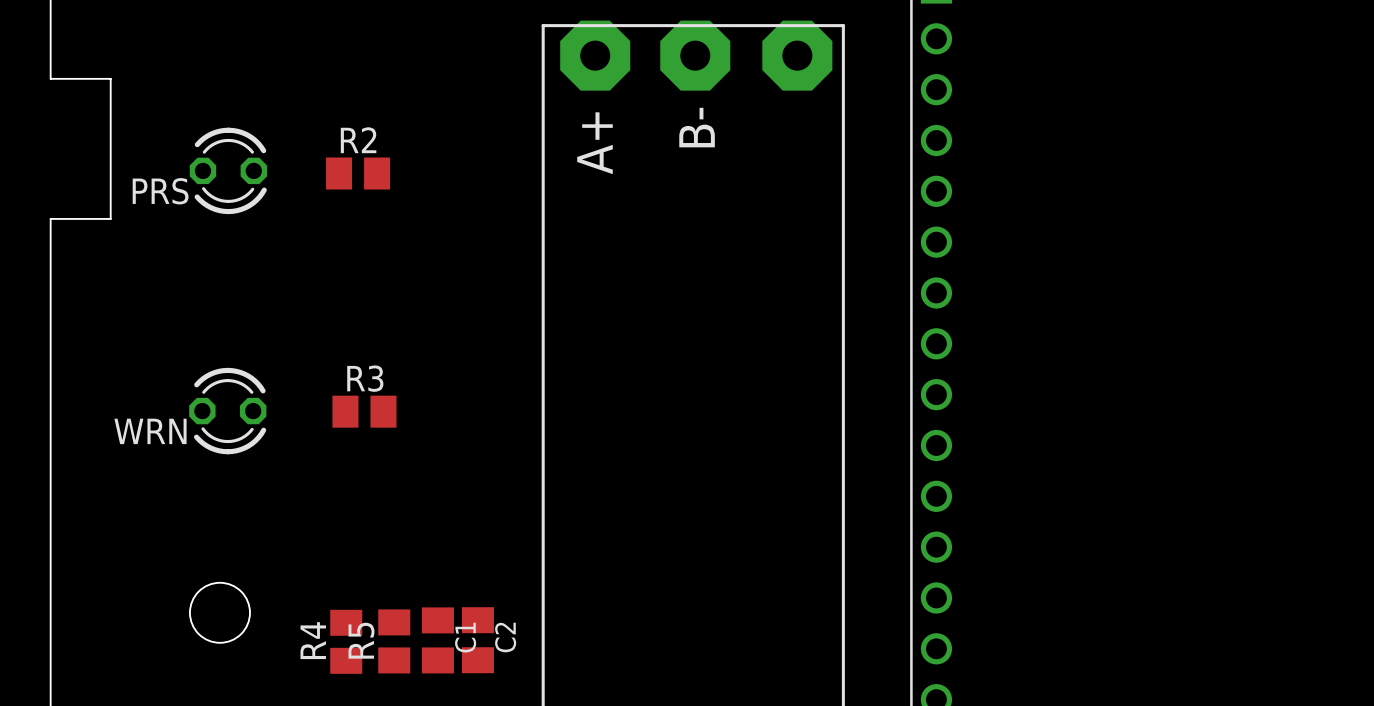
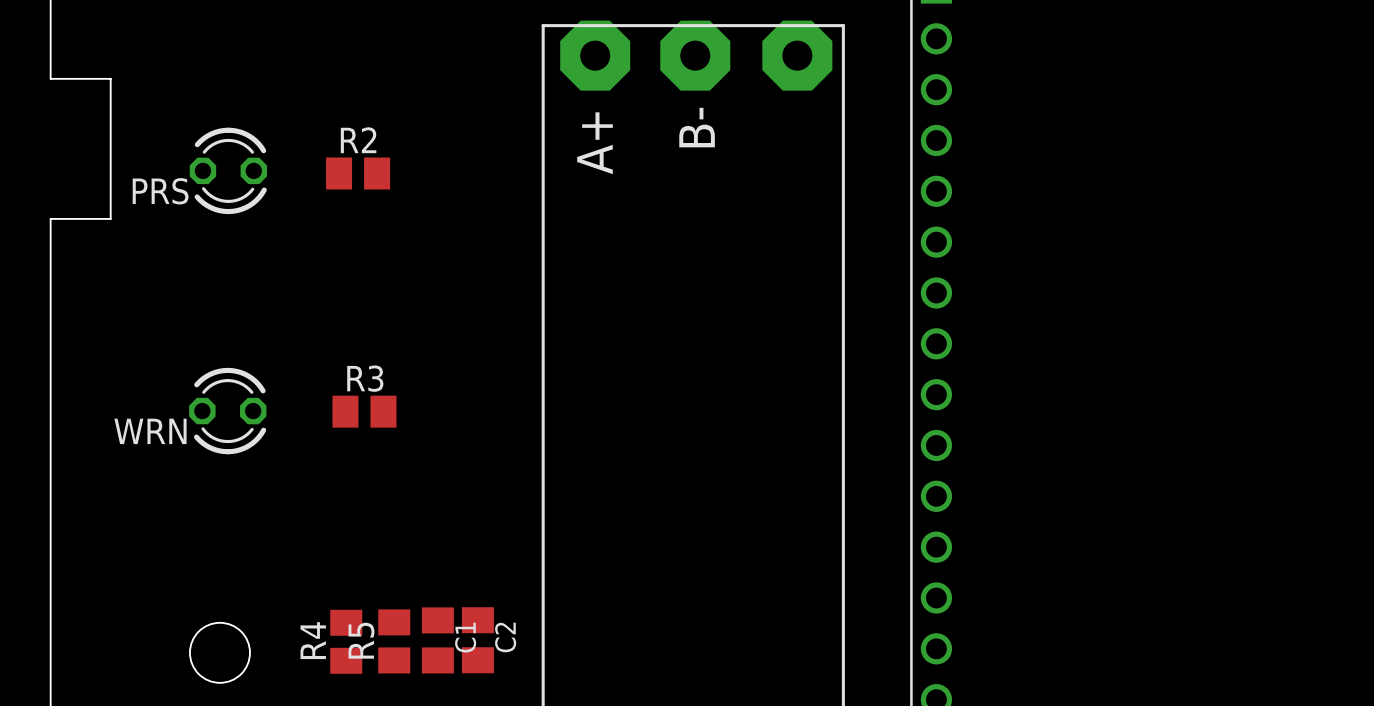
round board edge position: (219, 612) -> (219, 652)

